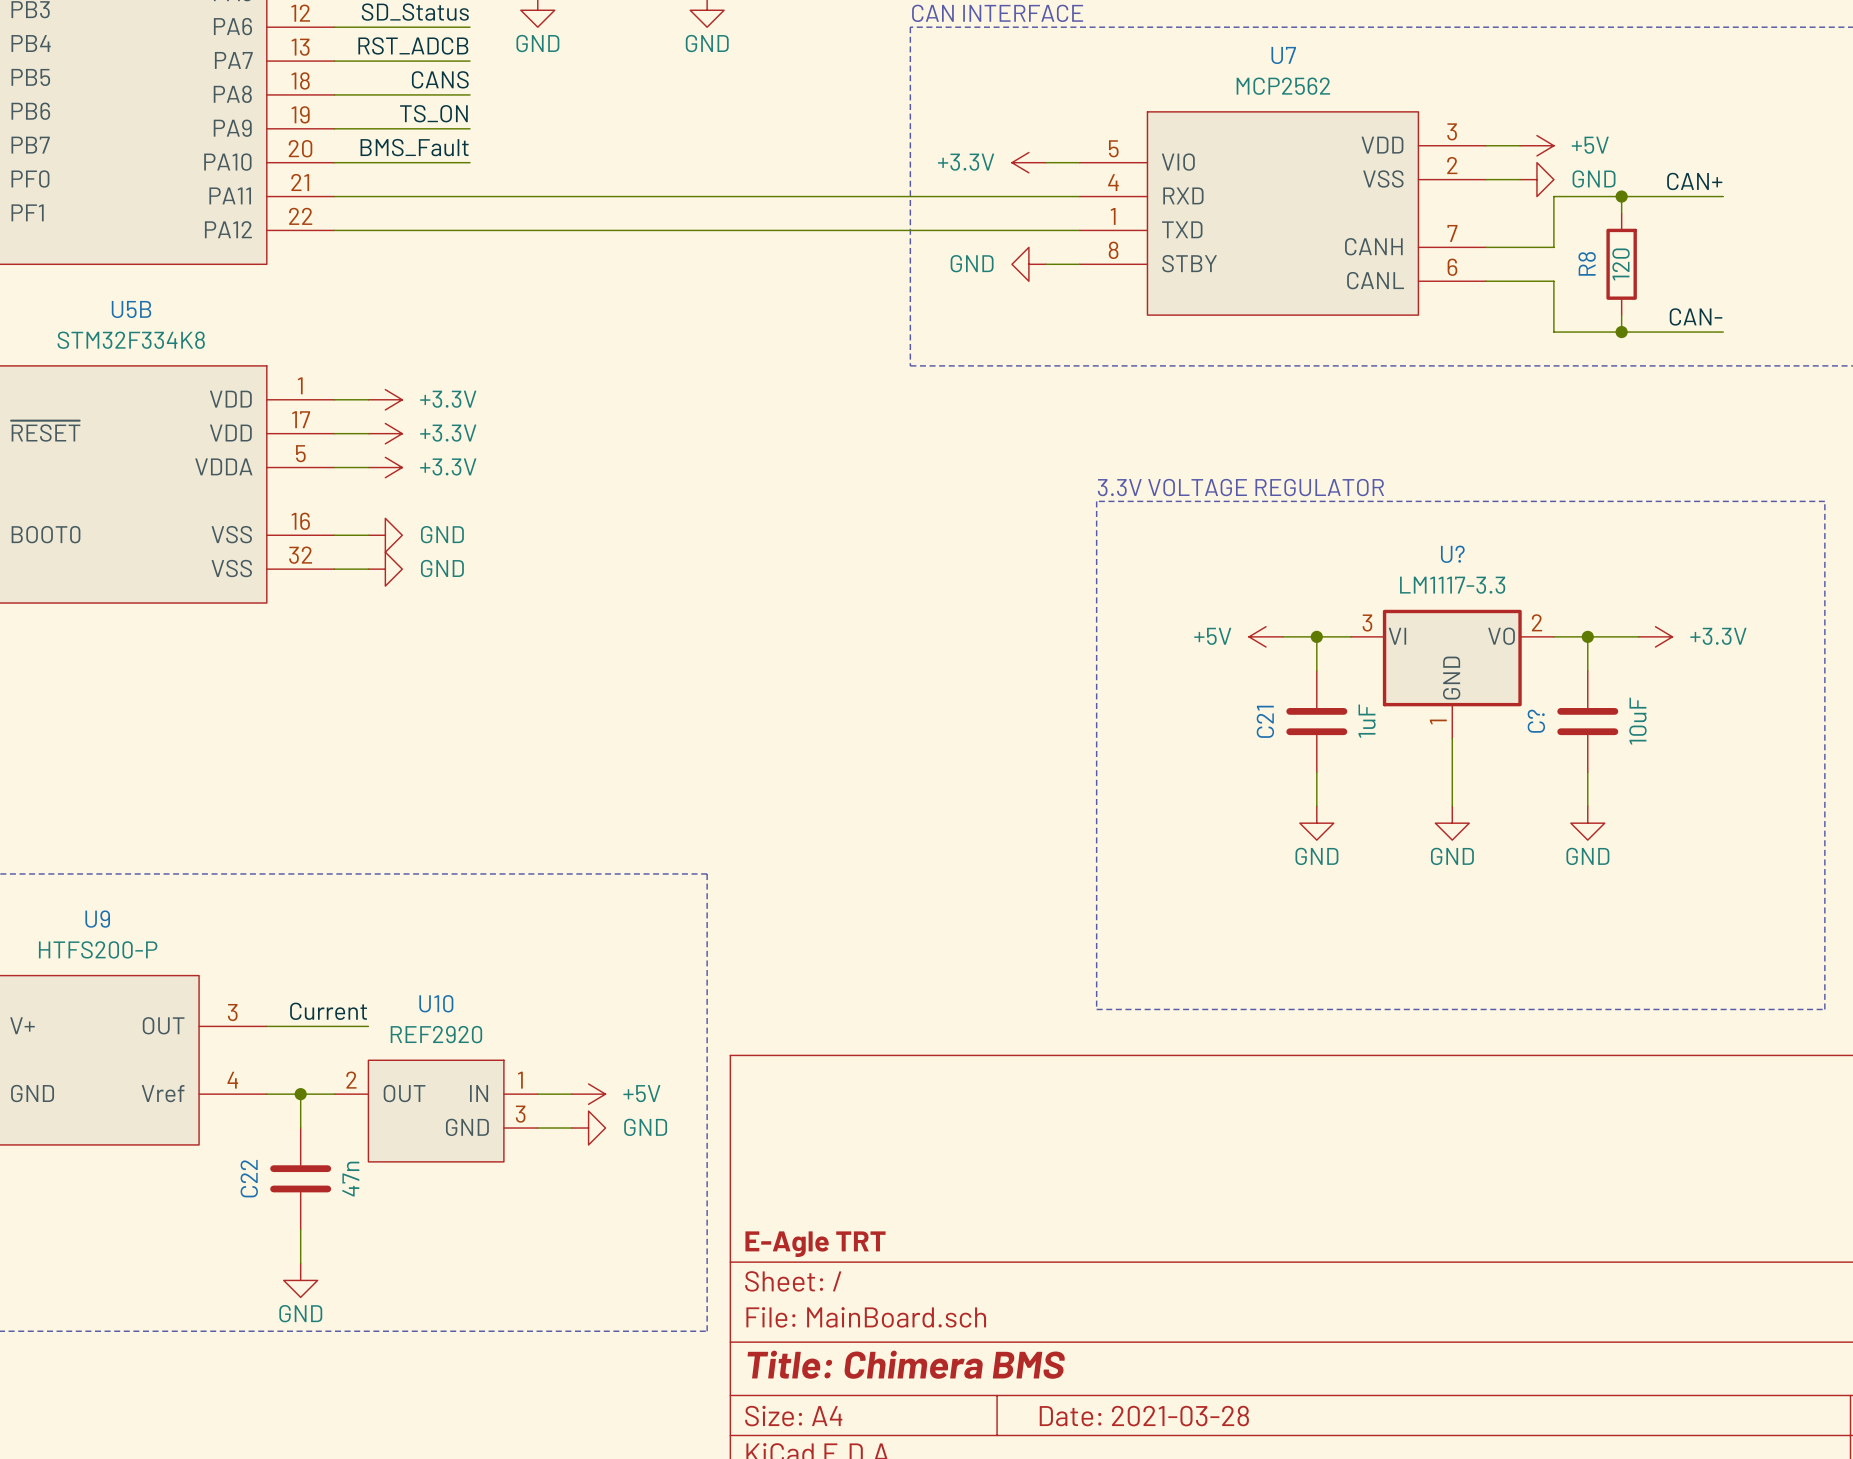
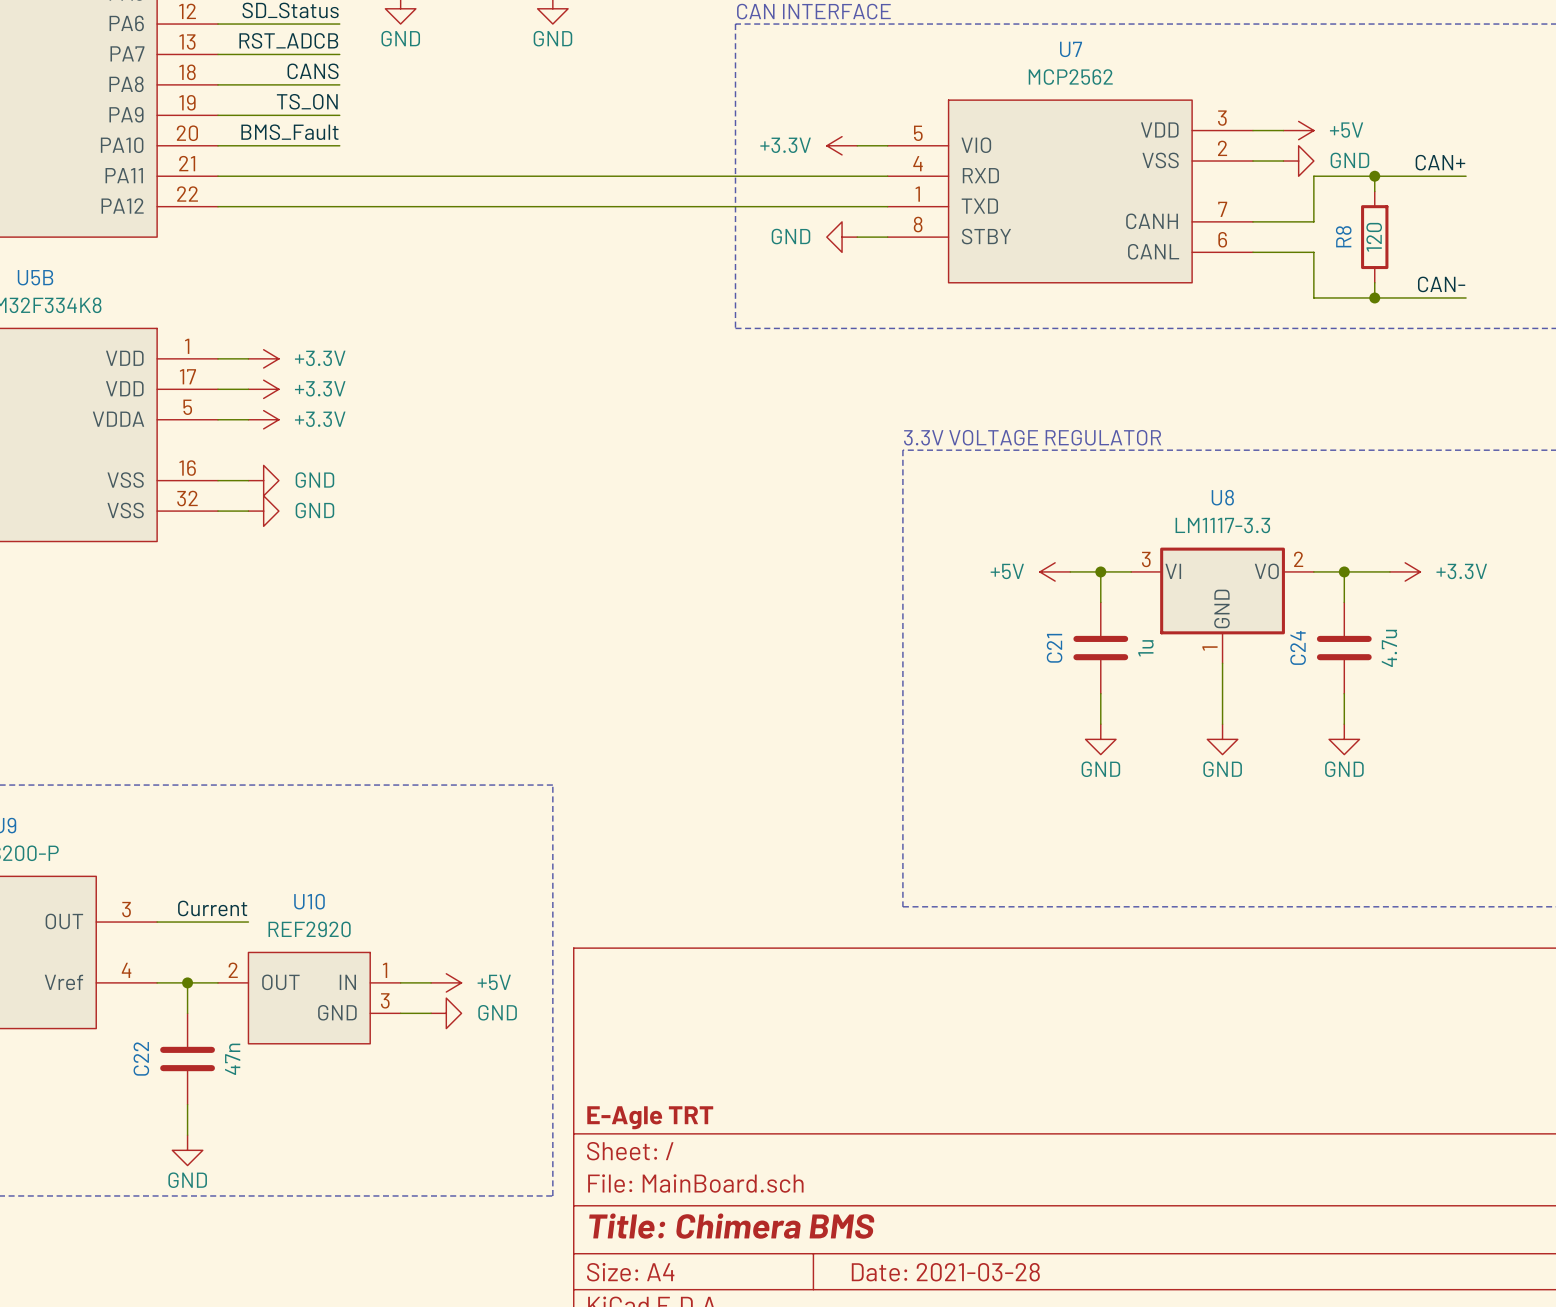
U? name: U? (1452, 554) -> U8 (1222, 497)
C21 value: 1uF (1367, 721) -> 1u (1145, 648)
C? name: C? (1536, 721) -> C24 (1298, 647)
C? value: 10uF (1637, 721) -> 4.7u (1389, 648)

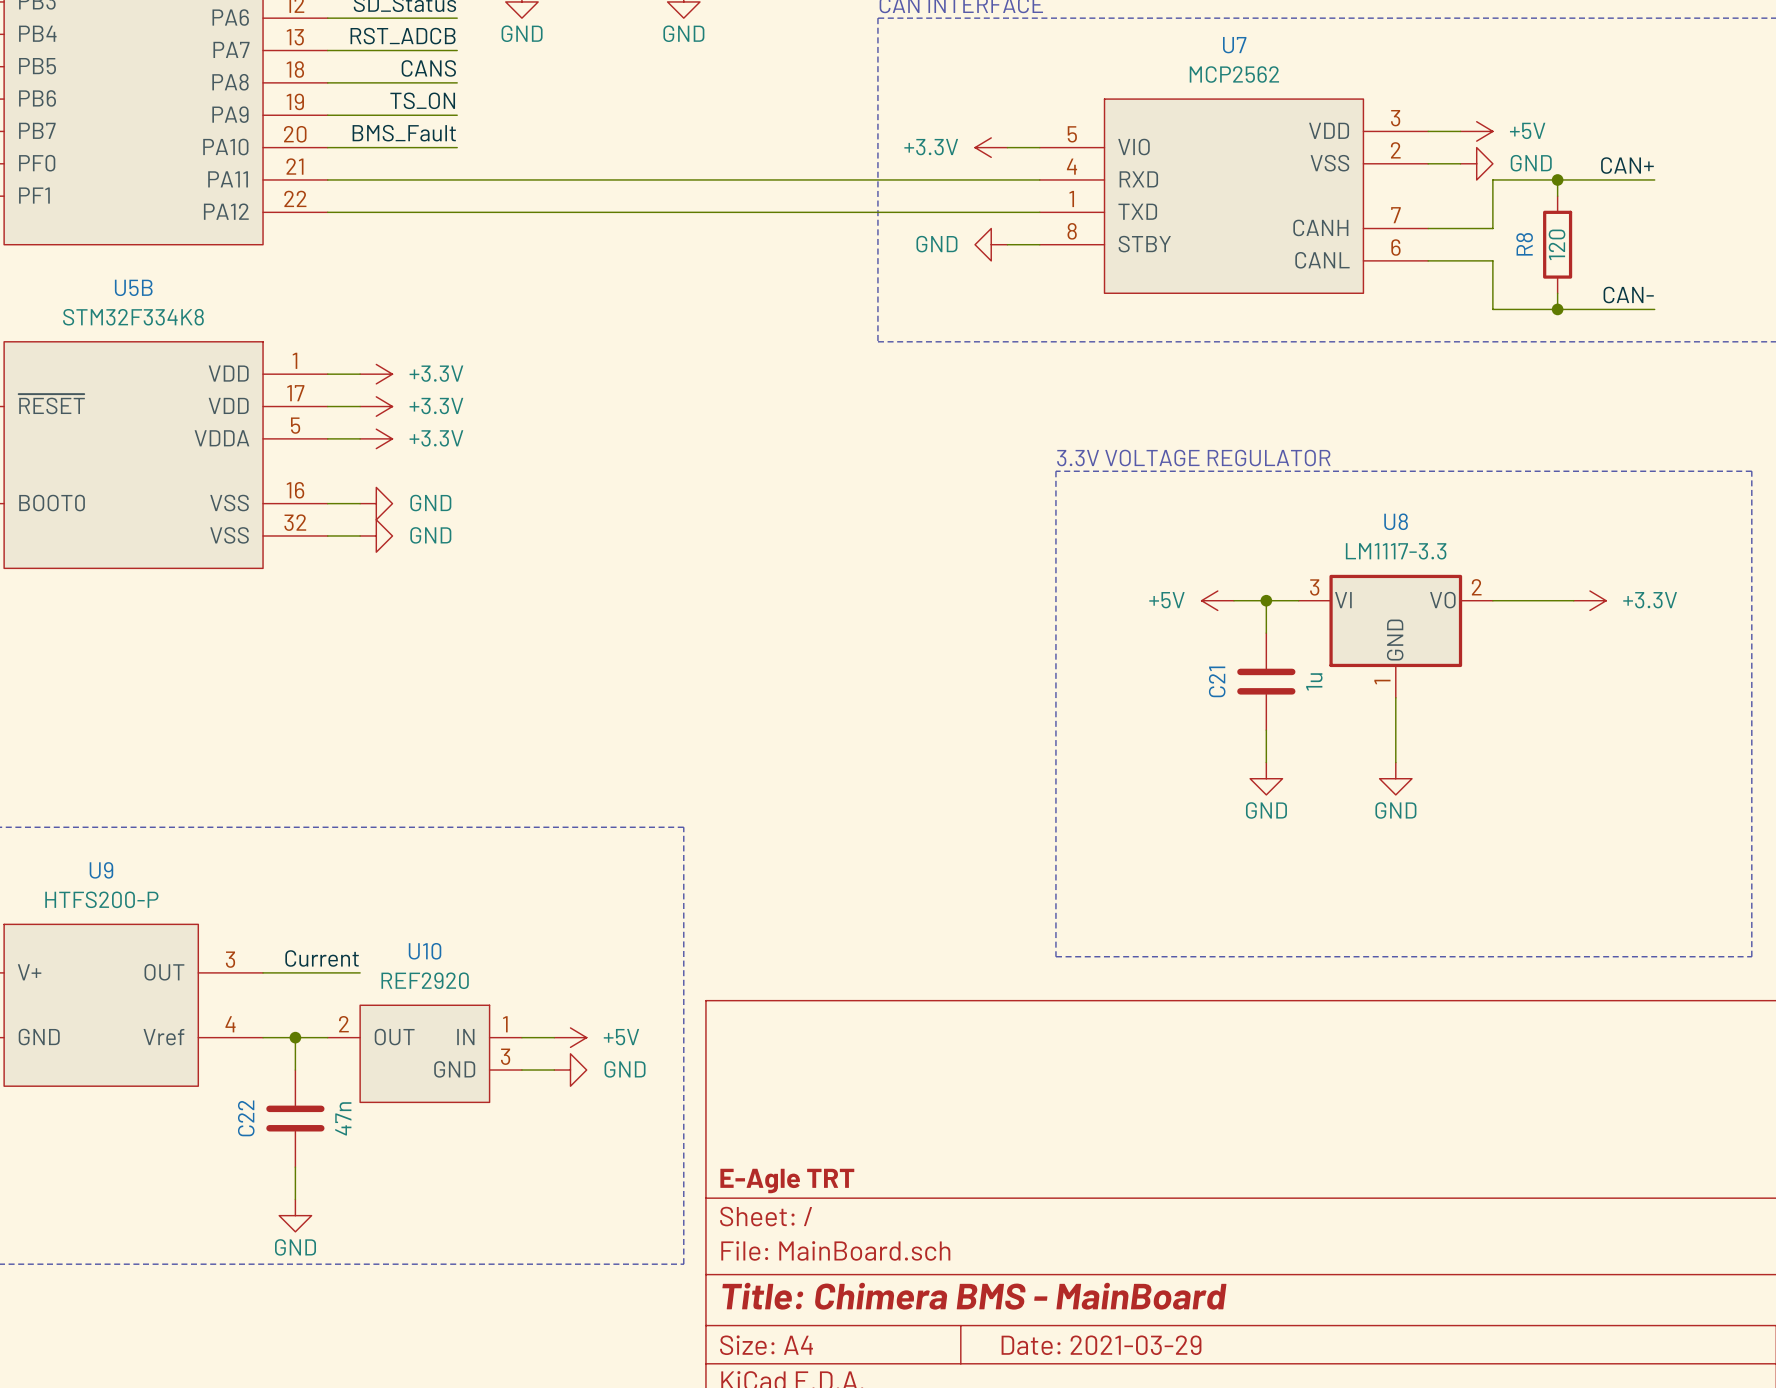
wire: (1344, 571) (1344, 602) -> none
junction: (1344, 571) -> none
C24: 4.7u (1344, 648) -> none
wire: (1344, 693) (1344, 724) -> none
power symbol: GND (1344, 739) -> none
title block: Title: Chimera BMS (731, 1226) -> Title: Chimera BMS - MainBoard (974, 1296)
title block: Date: 2021-03-28 (945, 1272) -> Date: 2021-03-29 (1101, 1345)

